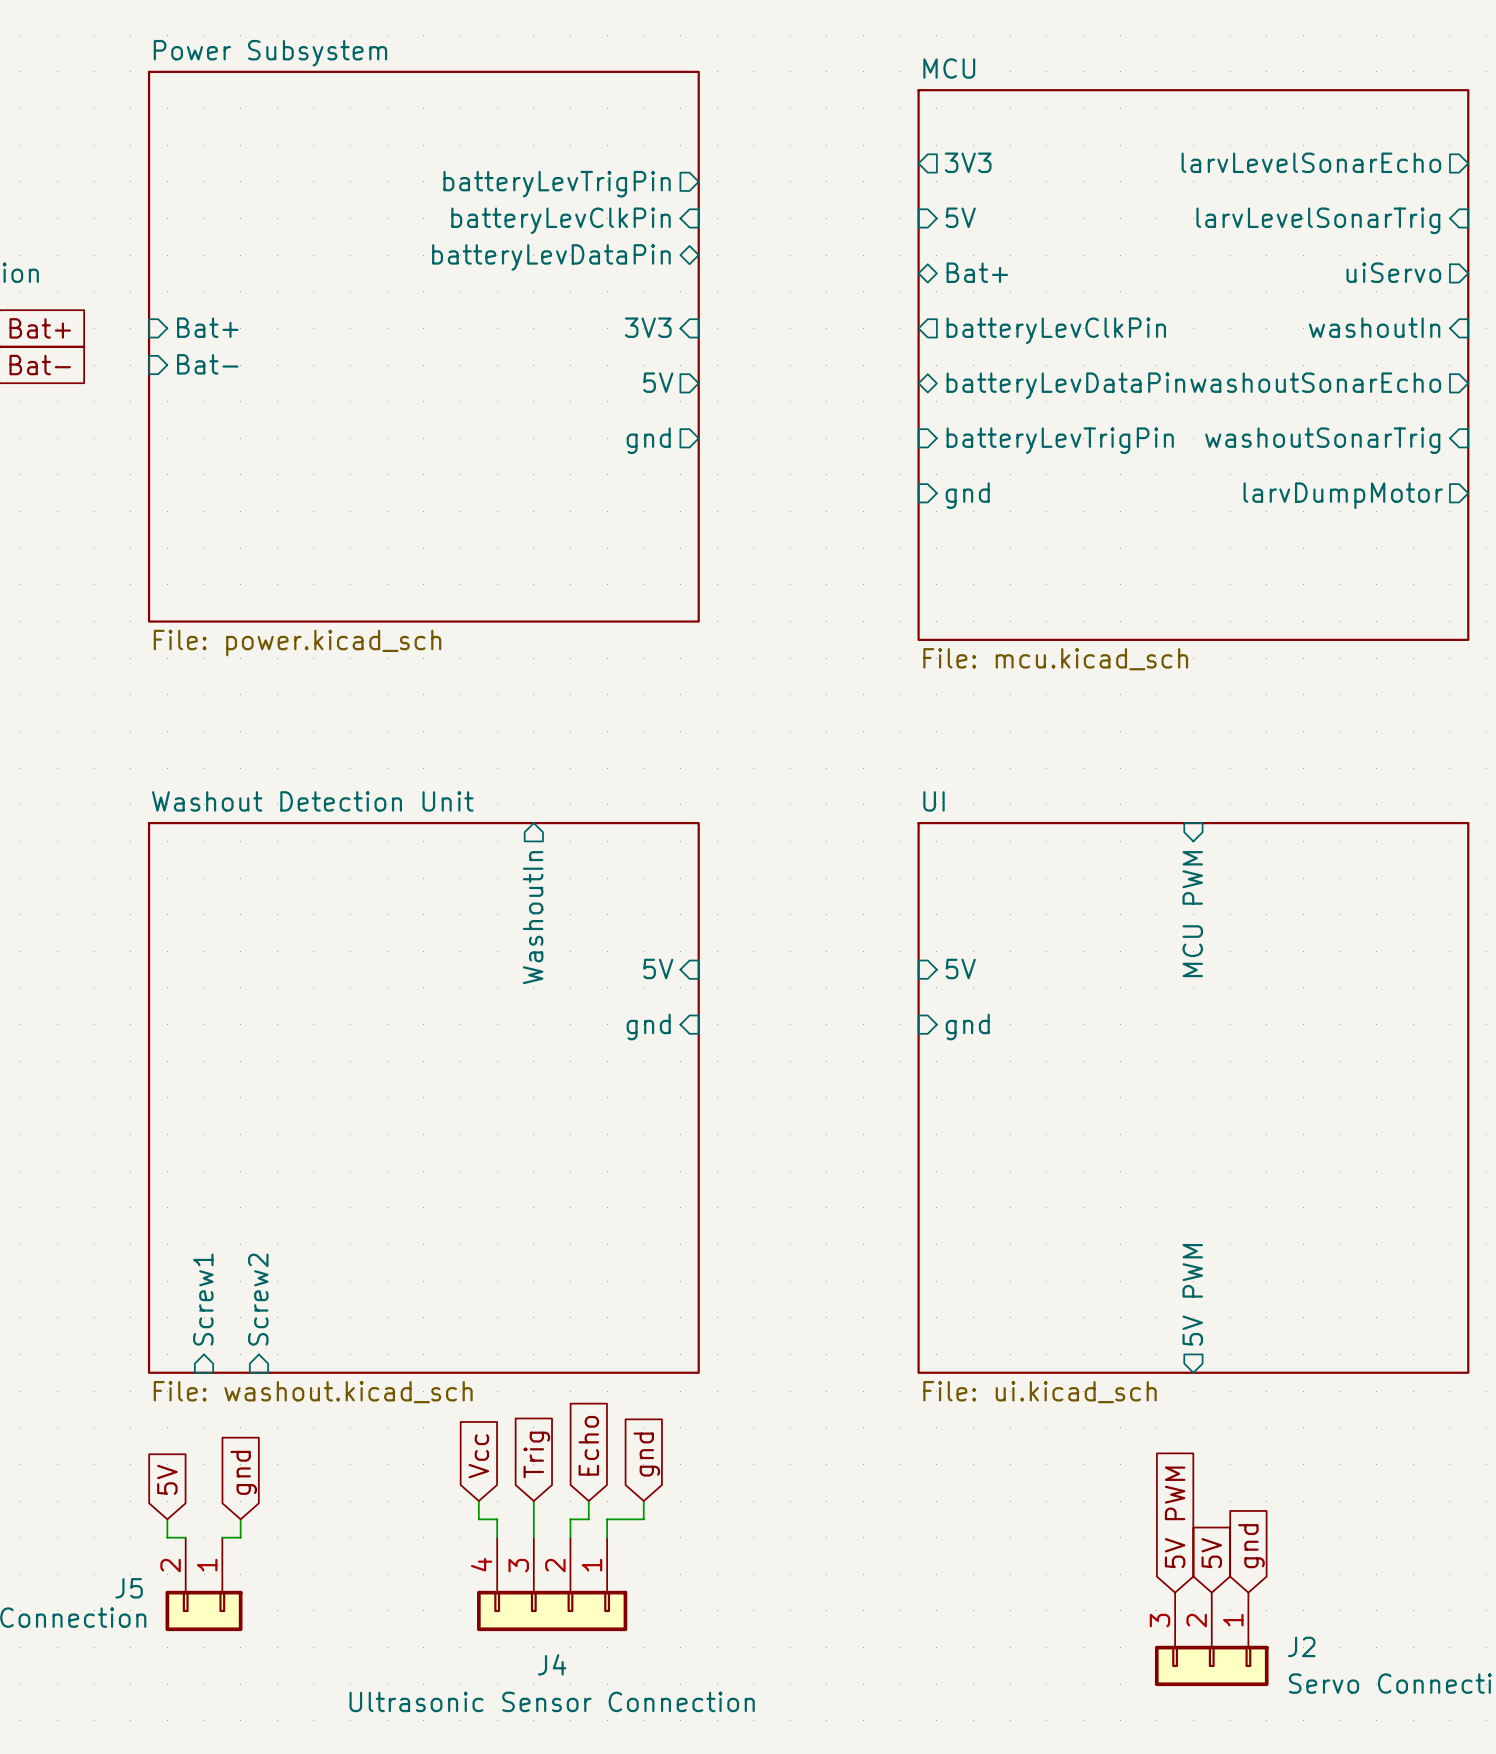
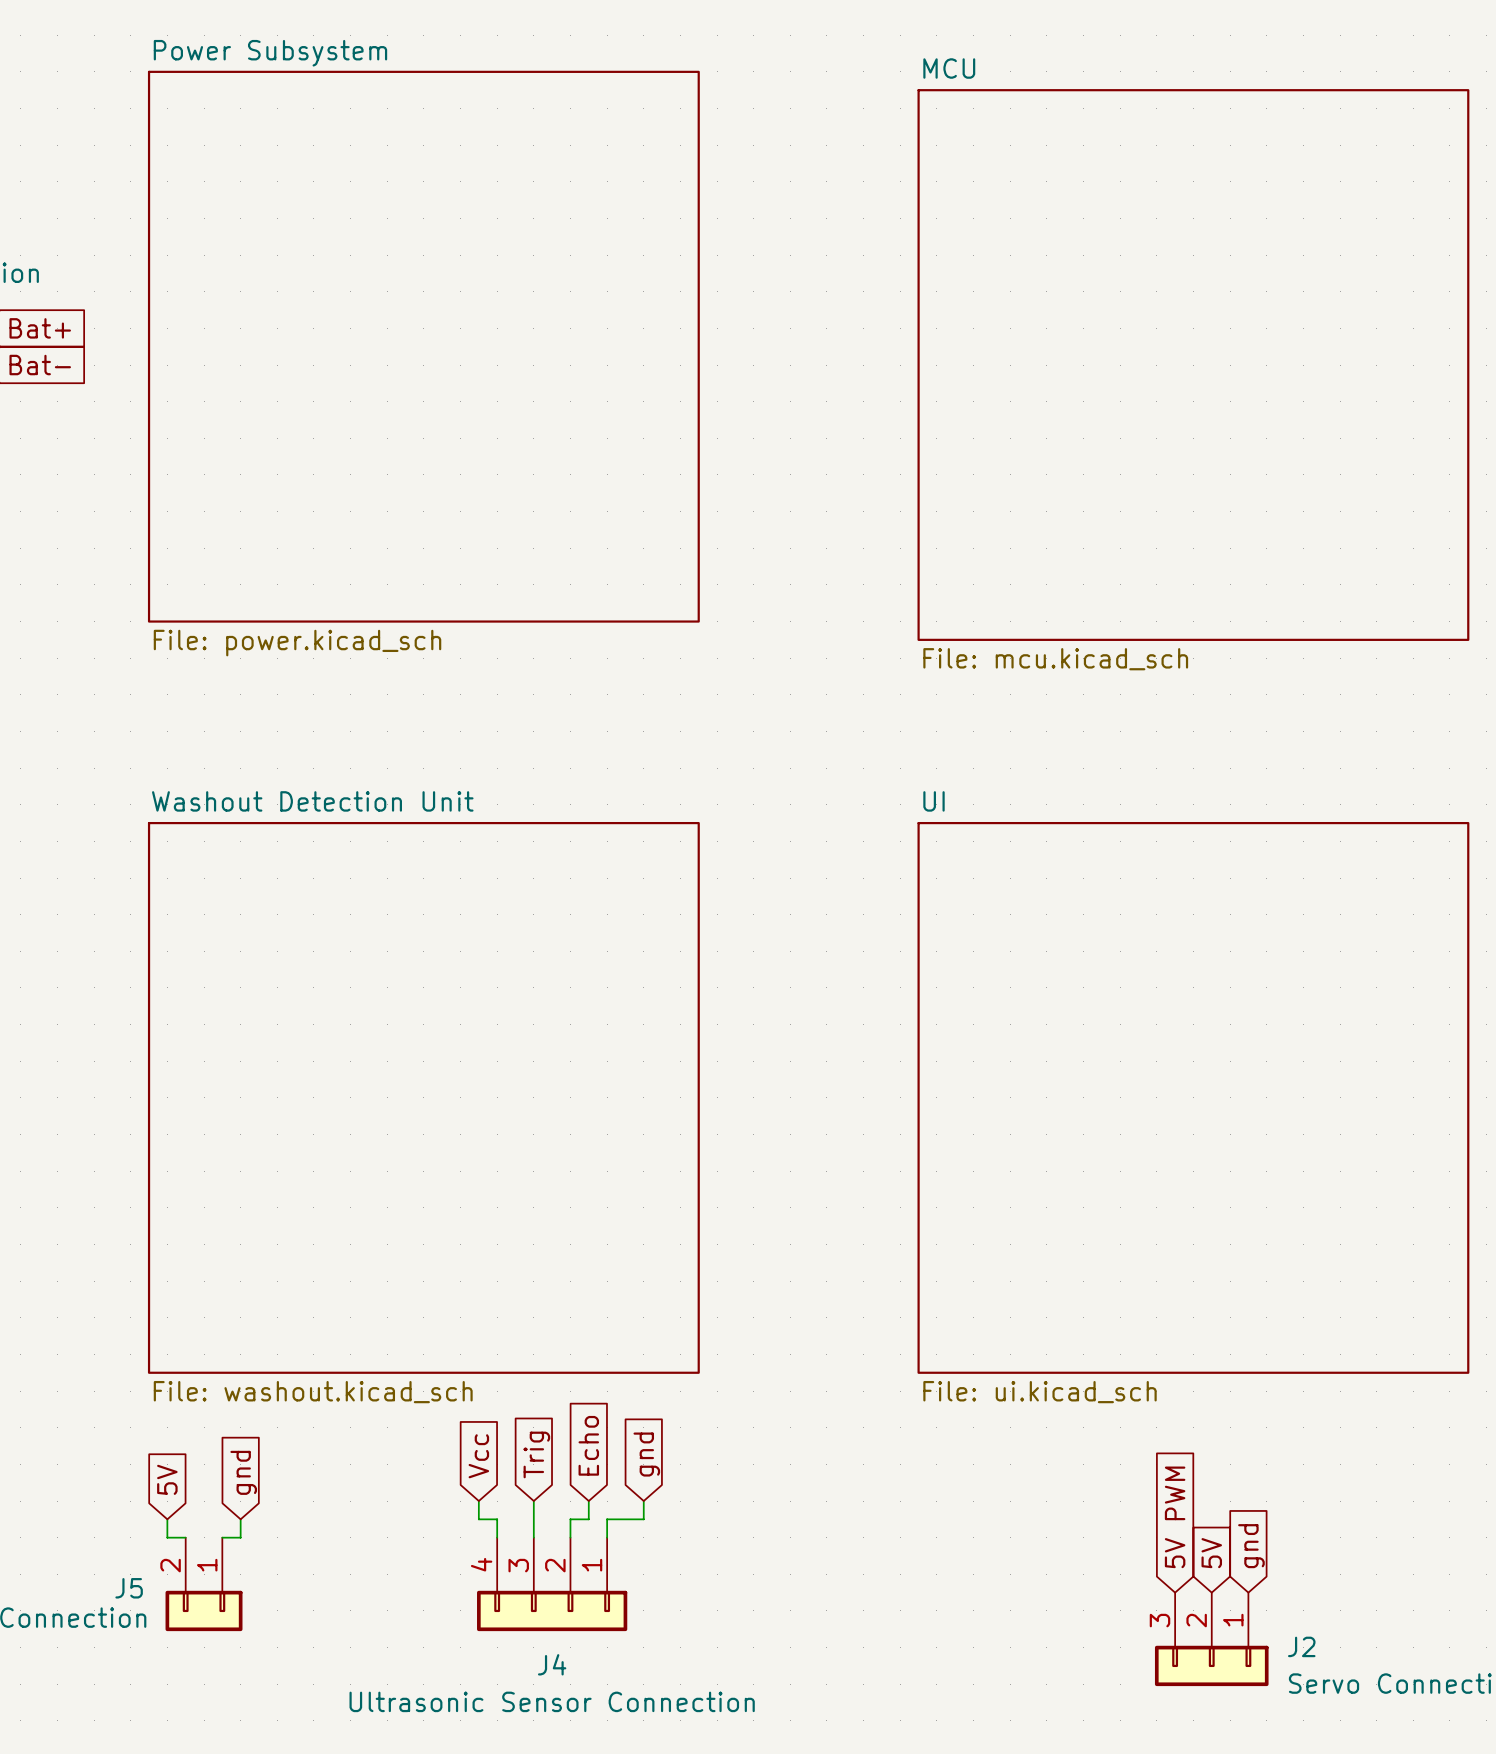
sheet pin: 3V3 (968, 162) -> none
sheet pin: larvLevelSonarEcho (1311, 162) -> none
sheet pin: batteryLevTrigPin (557, 184) -> none
sheet pin: 5V (960, 217) -> none
sheet pin: batteryLevClkPin (561, 220) -> none
sheet pin: larvLevelSonarTrig (1318, 220) -> none
sheet pin: batteryLevDataPin (551, 257) -> none
sheet pin: Bat+ (977, 272) -> none
sheet pin: uiServo (1393, 272) -> none
sheet pin: Bat+ (207, 327) -> none
sheet pin: 3V3 (648, 327) -> none
sheet pin: washoutIn (1374, 327) -> none
sheet pin: batteryLevClkPin (1056, 330) -> none
sheet pin: Bat- (207, 364) -> none
sheet pin: 5V (658, 382) -> none
sheet pin: washoutSonarEcho (1315, 382) -> none
sheet pin: batteryLevDataPin (1065, 385) -> none
sheet pin: gnd (648, 440) -> none
sheet pin: batteryLevTrigPin (1060, 440) -> none
sheet pin: washoutSonarTrig (1322, 440) -> none
sheet pin: gnd (967, 495) -> none
sheet pin: larvDumpMotor (1343, 495) -> none
sheet pin: MCU PWM (1192, 914) -> none
sheet pin: WashoutIn (533, 917) -> none
sheet pin: 5V (658, 968) -> none
sheet pin: 5V (960, 968) -> none
sheet pin: gnd (648, 1027) -> none
sheet pin: gnd (967, 1027) -> none
sheet pin: 5V PWM (1192, 1294) -> none
sheet pin: Screw1 (203, 1299) -> none
sheet pin: Screw2 (258, 1299) -> none

